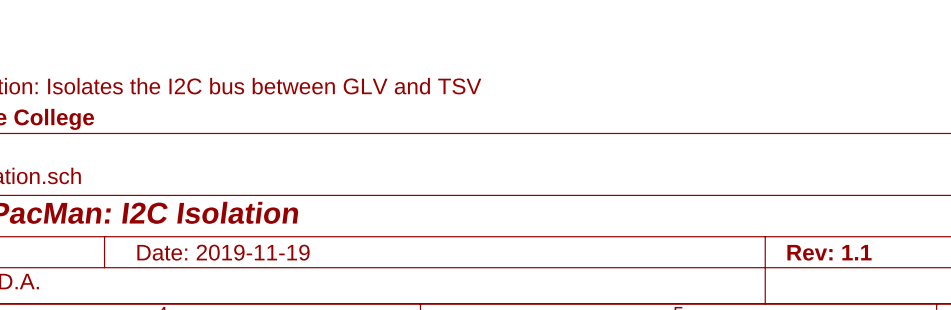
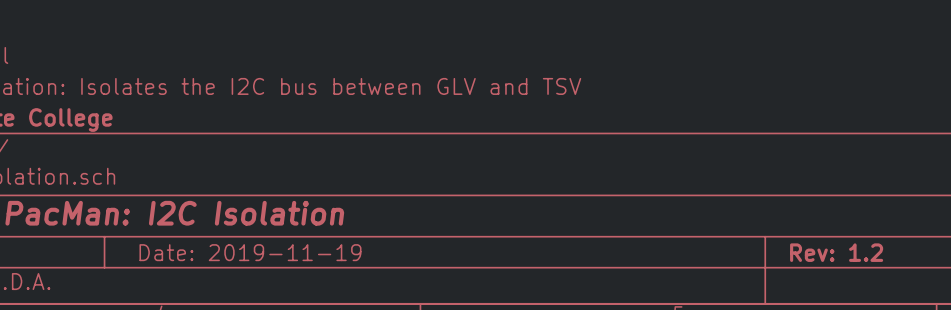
title block: Rev: 1.1 (829, 252) -> Rev: 1.2 (836, 252)

